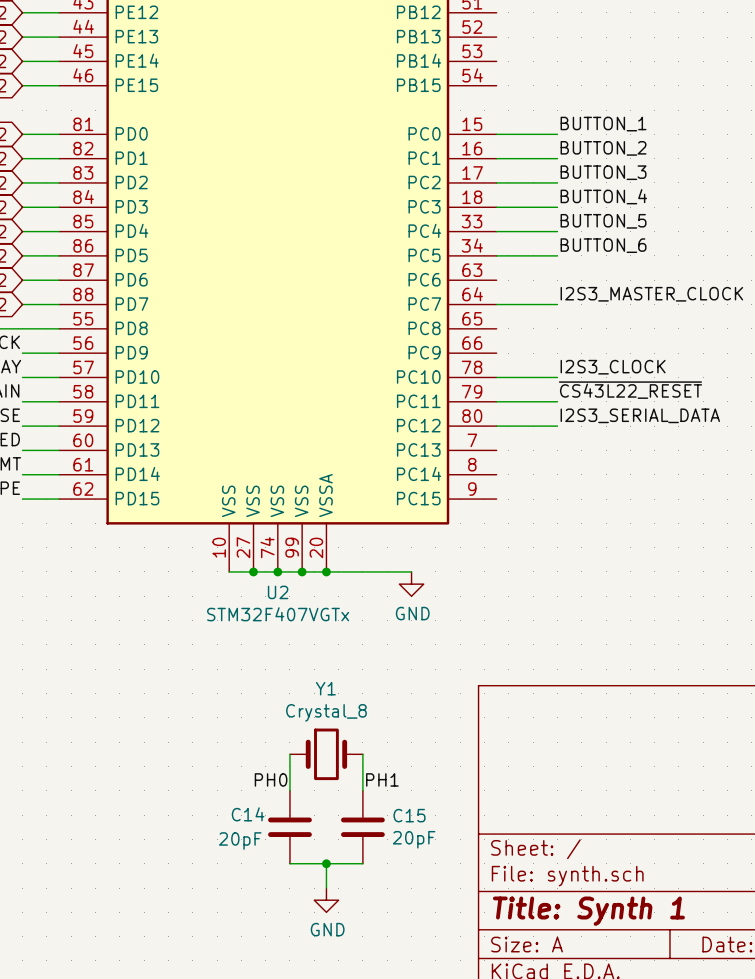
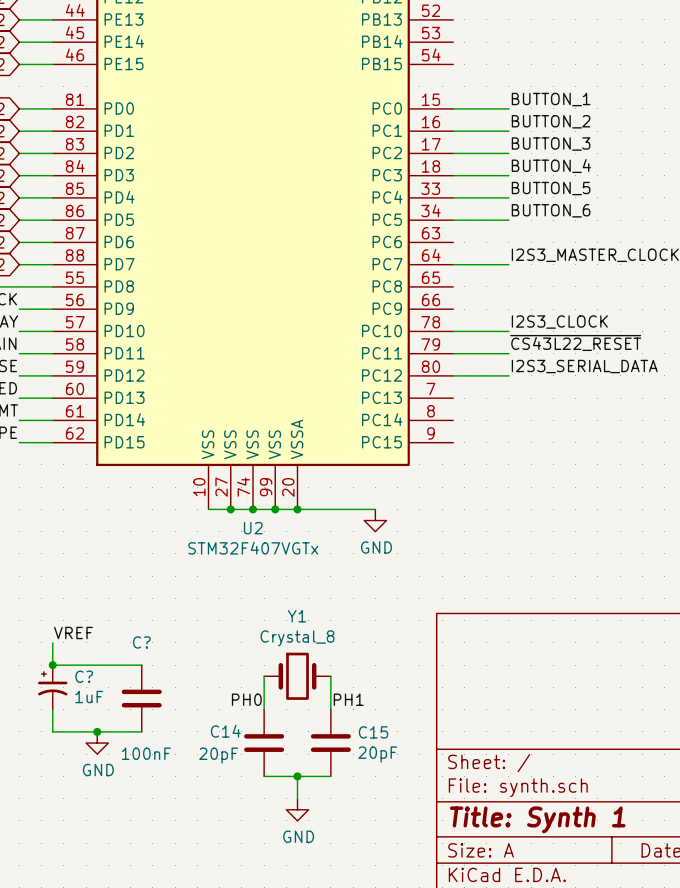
label: none -> VREF (73, 632)
wire: none -> (52, 642) (52, 665) (141, 665)
junction: none -> (52, 665)
C?: none -> 1uF (52, 687)
C?: none -> 100nF (141, 698)
wire: none -> (52, 709) (52, 731) (141, 731)
junction: none -> (97, 731)
power symbol: none -> GND (97, 743)

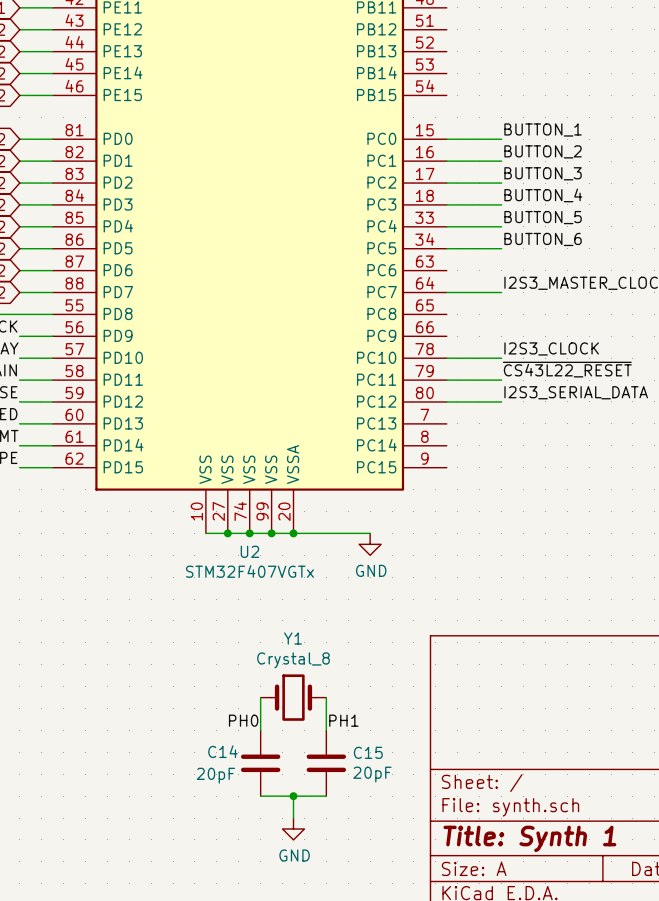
label: VREF (73, 632) -> none
wire: (52, 642) (52, 665) (141, 665) -> none
junction: (52, 665) -> none
C?: 1uF (52, 687) -> none
C?: 100nF (141, 698) -> none
wire: (52, 709) (52, 731) (141, 731) -> none
junction: (97, 731) -> none
power symbol: GND (97, 743) -> none

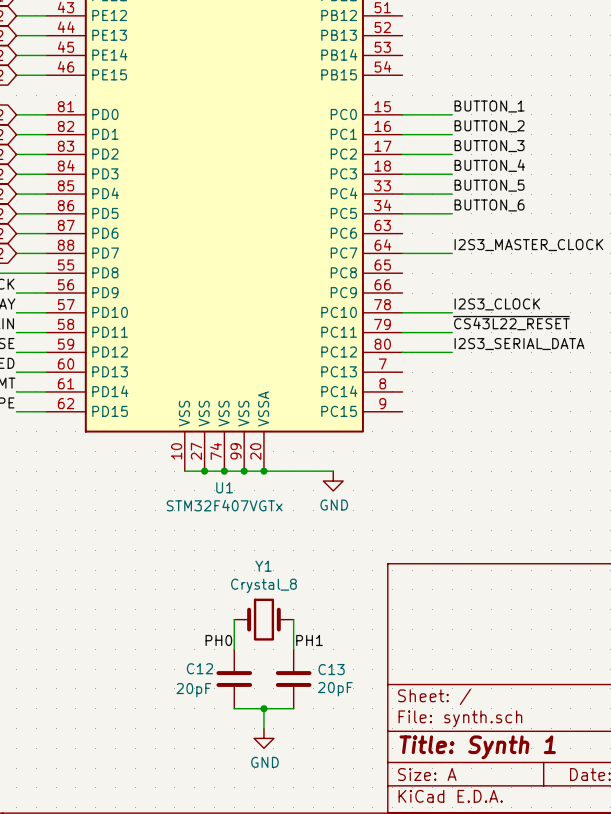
U2 name: U2 (249, 551) -> U1 (224, 487)
C14 name: C14 (222, 751) -> C12 (199, 668)
C15 name: C15 (368, 752) -> C13 (331, 669)

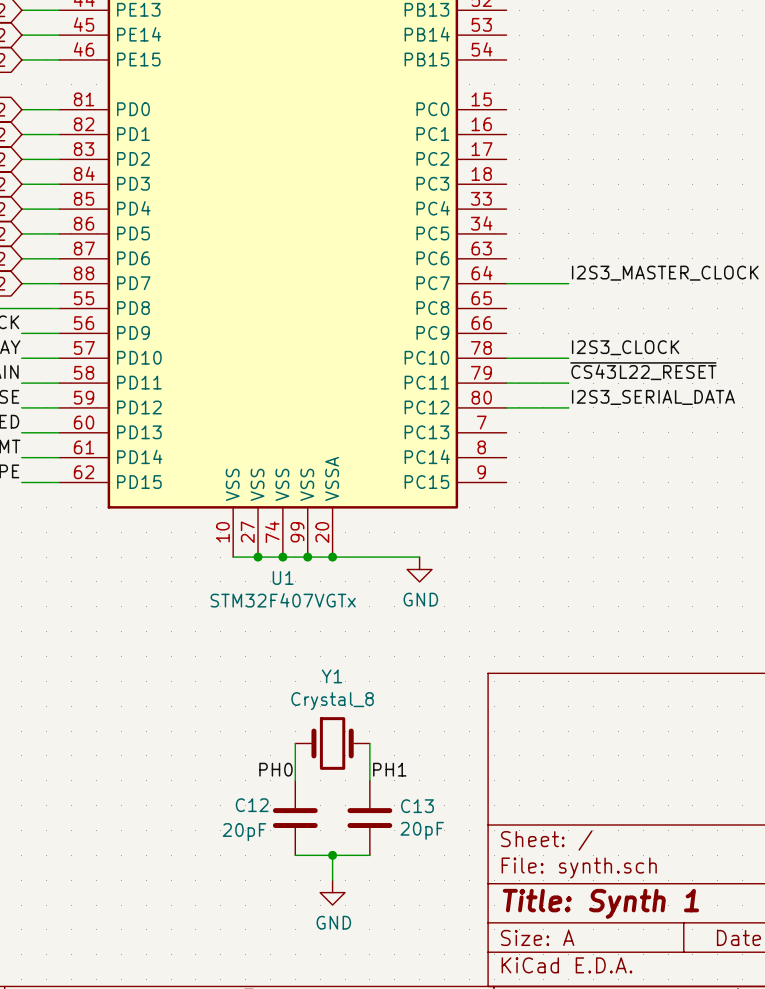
label: BUTTON_1 (489, 106) -> none
wire: (402, 114) (452, 114) -> none
label: BUTTON_2 (489, 126) -> none
wire: (402, 134) (452, 134) -> none
label: BUTTON_3 (489, 146) -> none
wire: (402, 154) (452, 154) -> none
label: BUTTON_4 (489, 165) -> none
wire: (402, 174) (452, 174) -> none
label: BUTTON_5 (489, 185) -> none
wire: (402, 194) (452, 194) -> none
label: BUTTON_6 (489, 205) -> none
wire: (402, 213) (452, 213) -> none

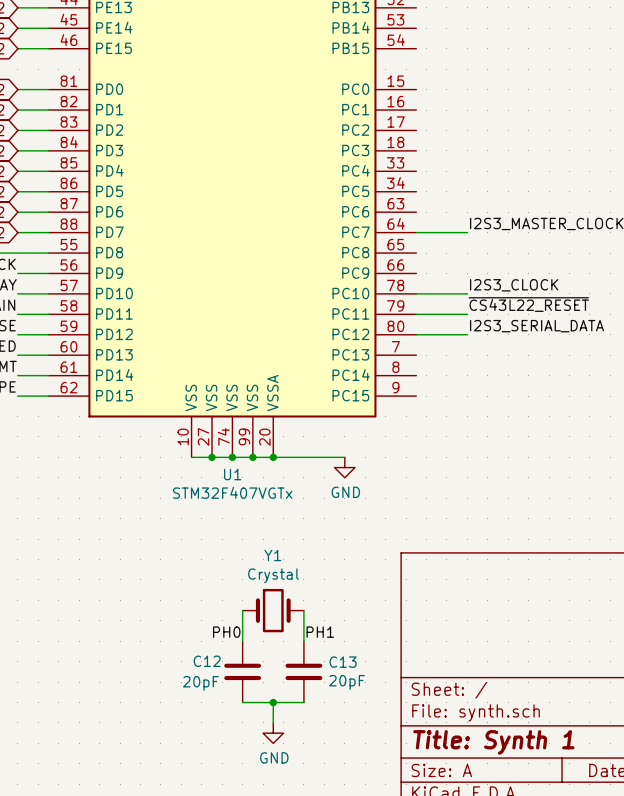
Y1 value: Crystal_8 (332, 701) -> Crystal (273, 575)

